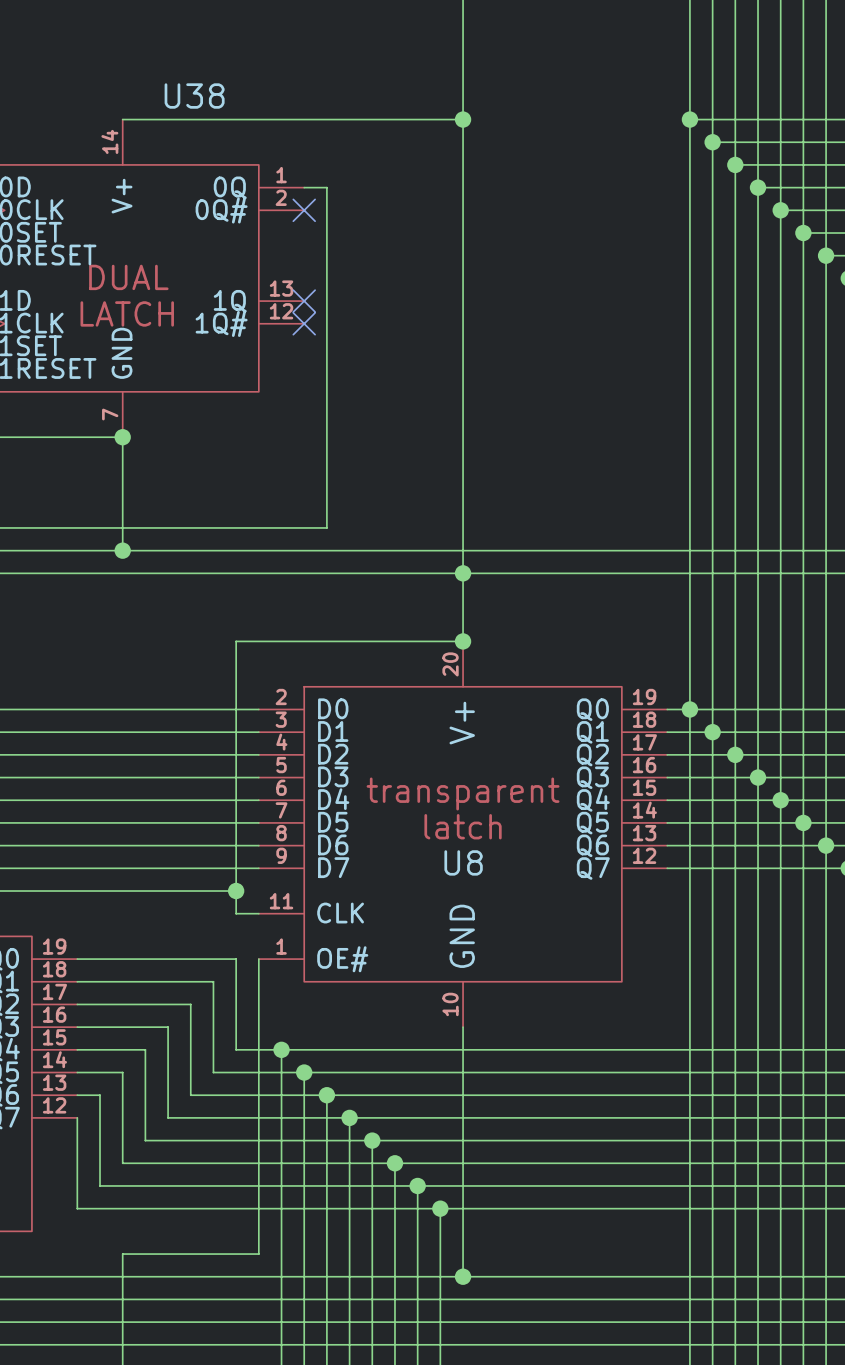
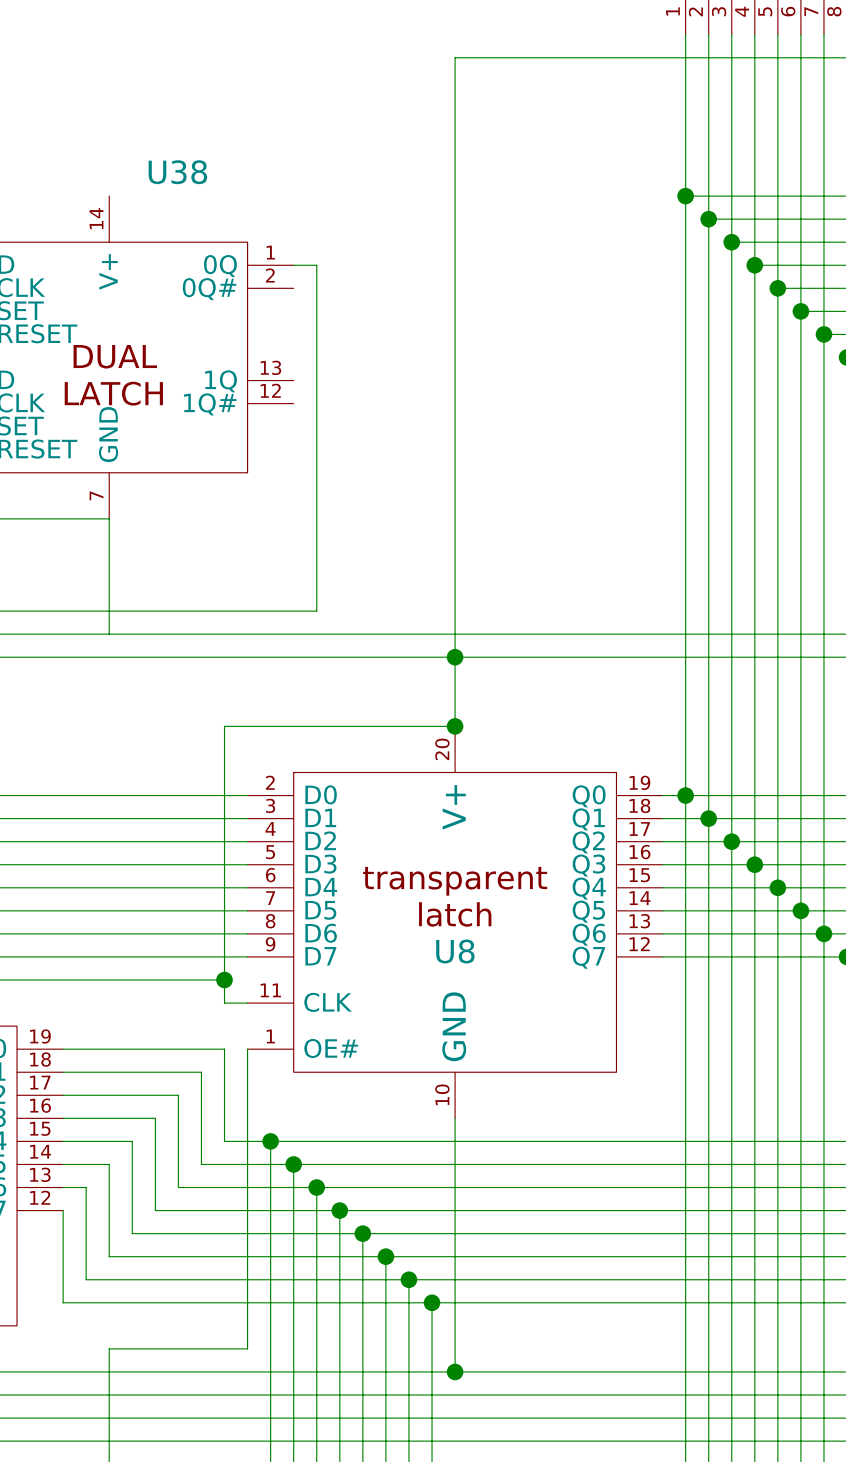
wire: (122, 119) (463, 119) -> none
junction: (463, 119) -> none
no-connect mark: (304, 210) -> none
no-connect mark: (304, 301) -> none
no-connect mark: (304, 323) -> none
junction: (122, 437) -> none
junction: (122, 550) -> none

